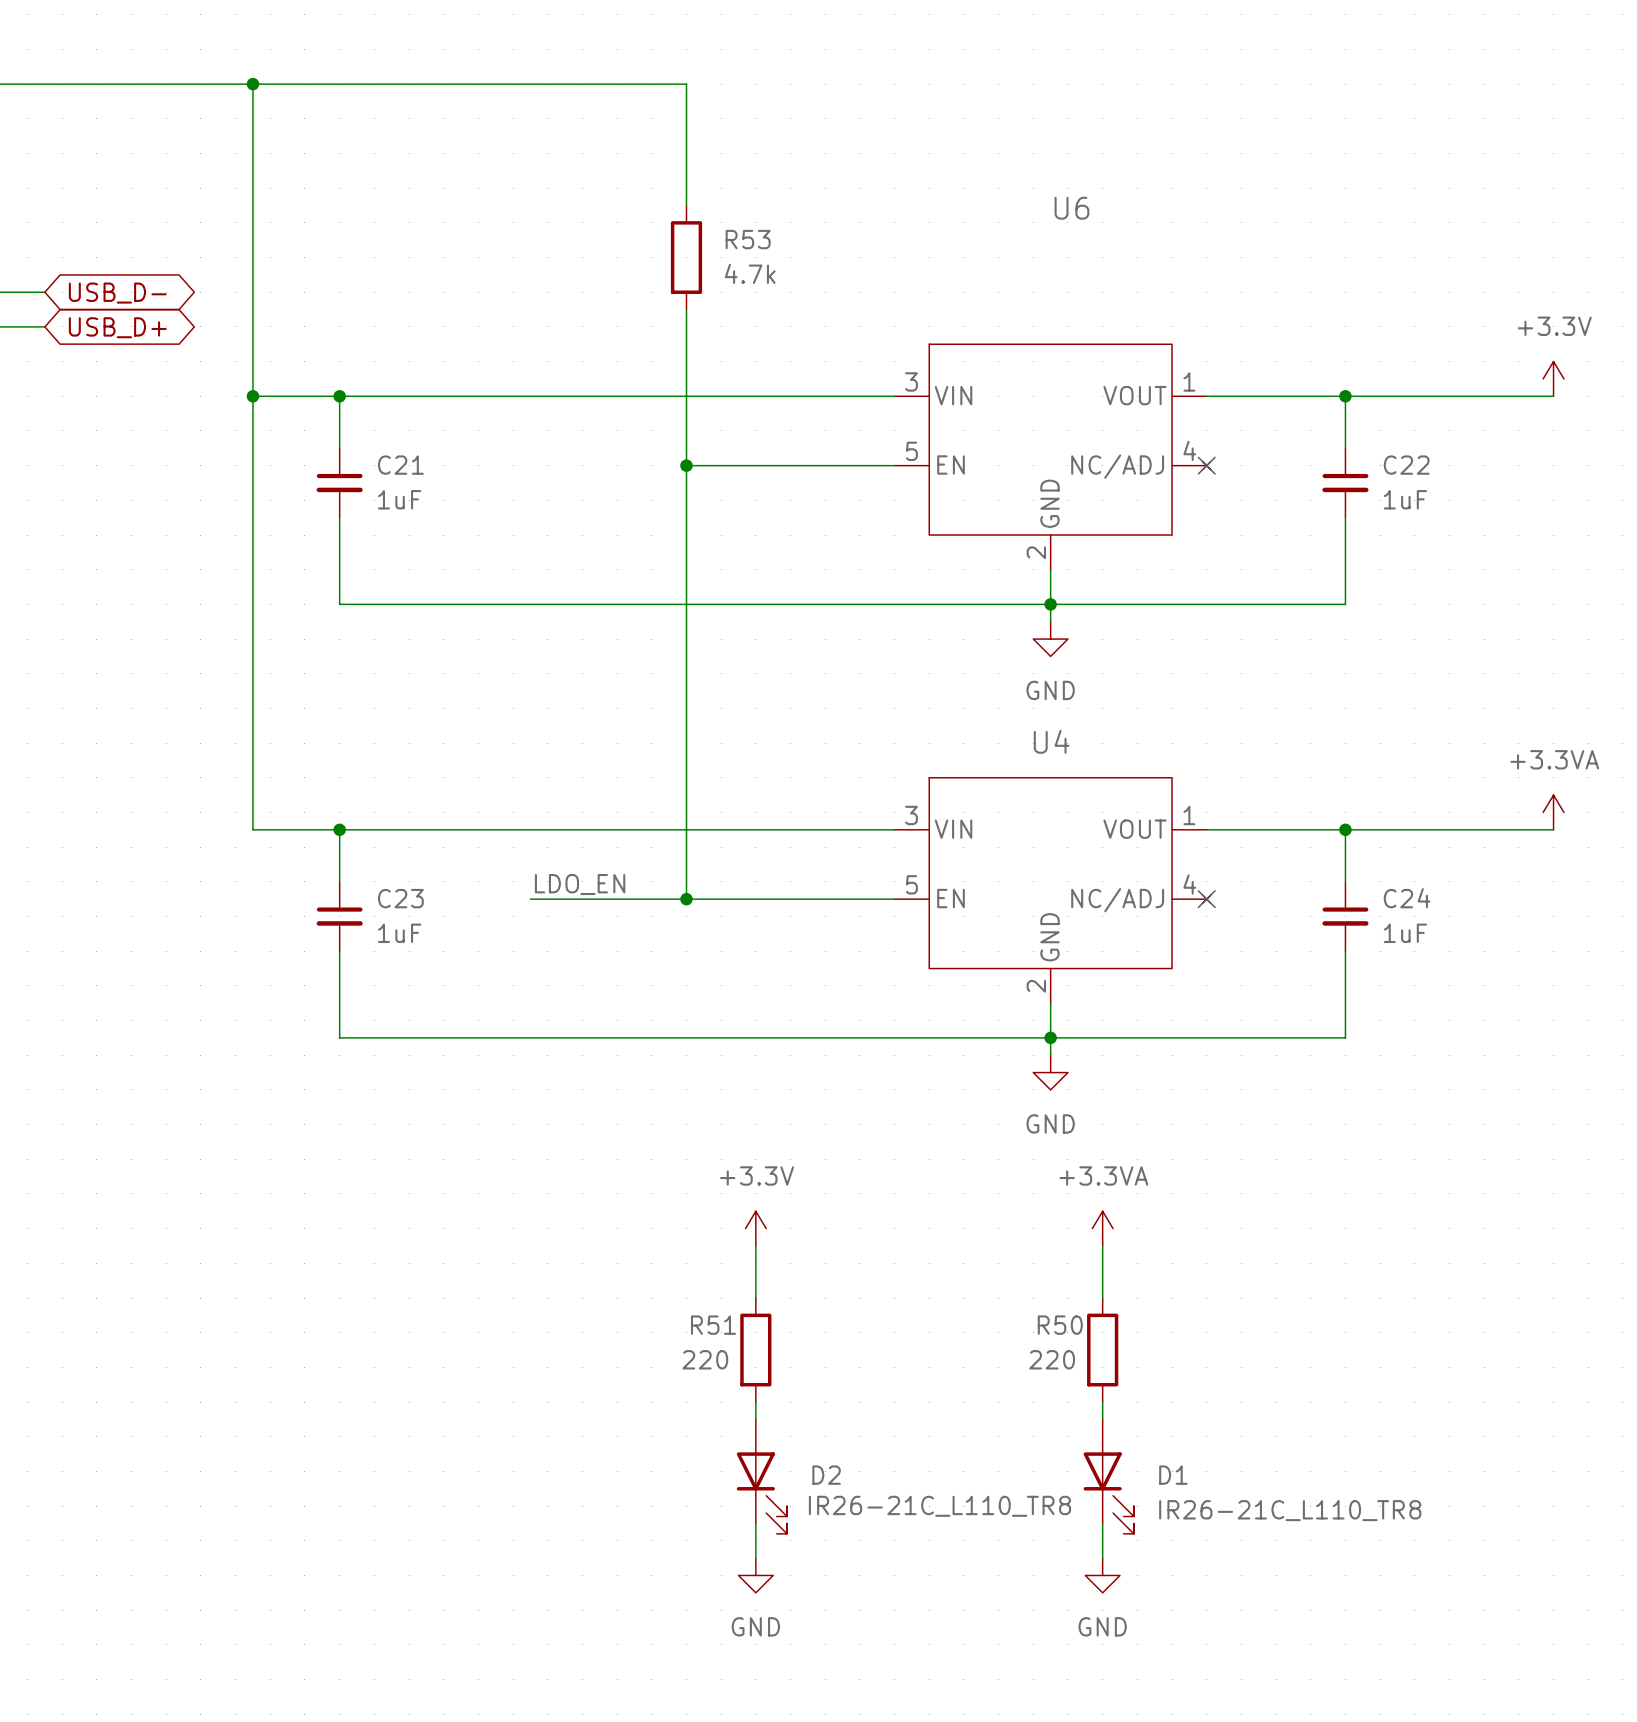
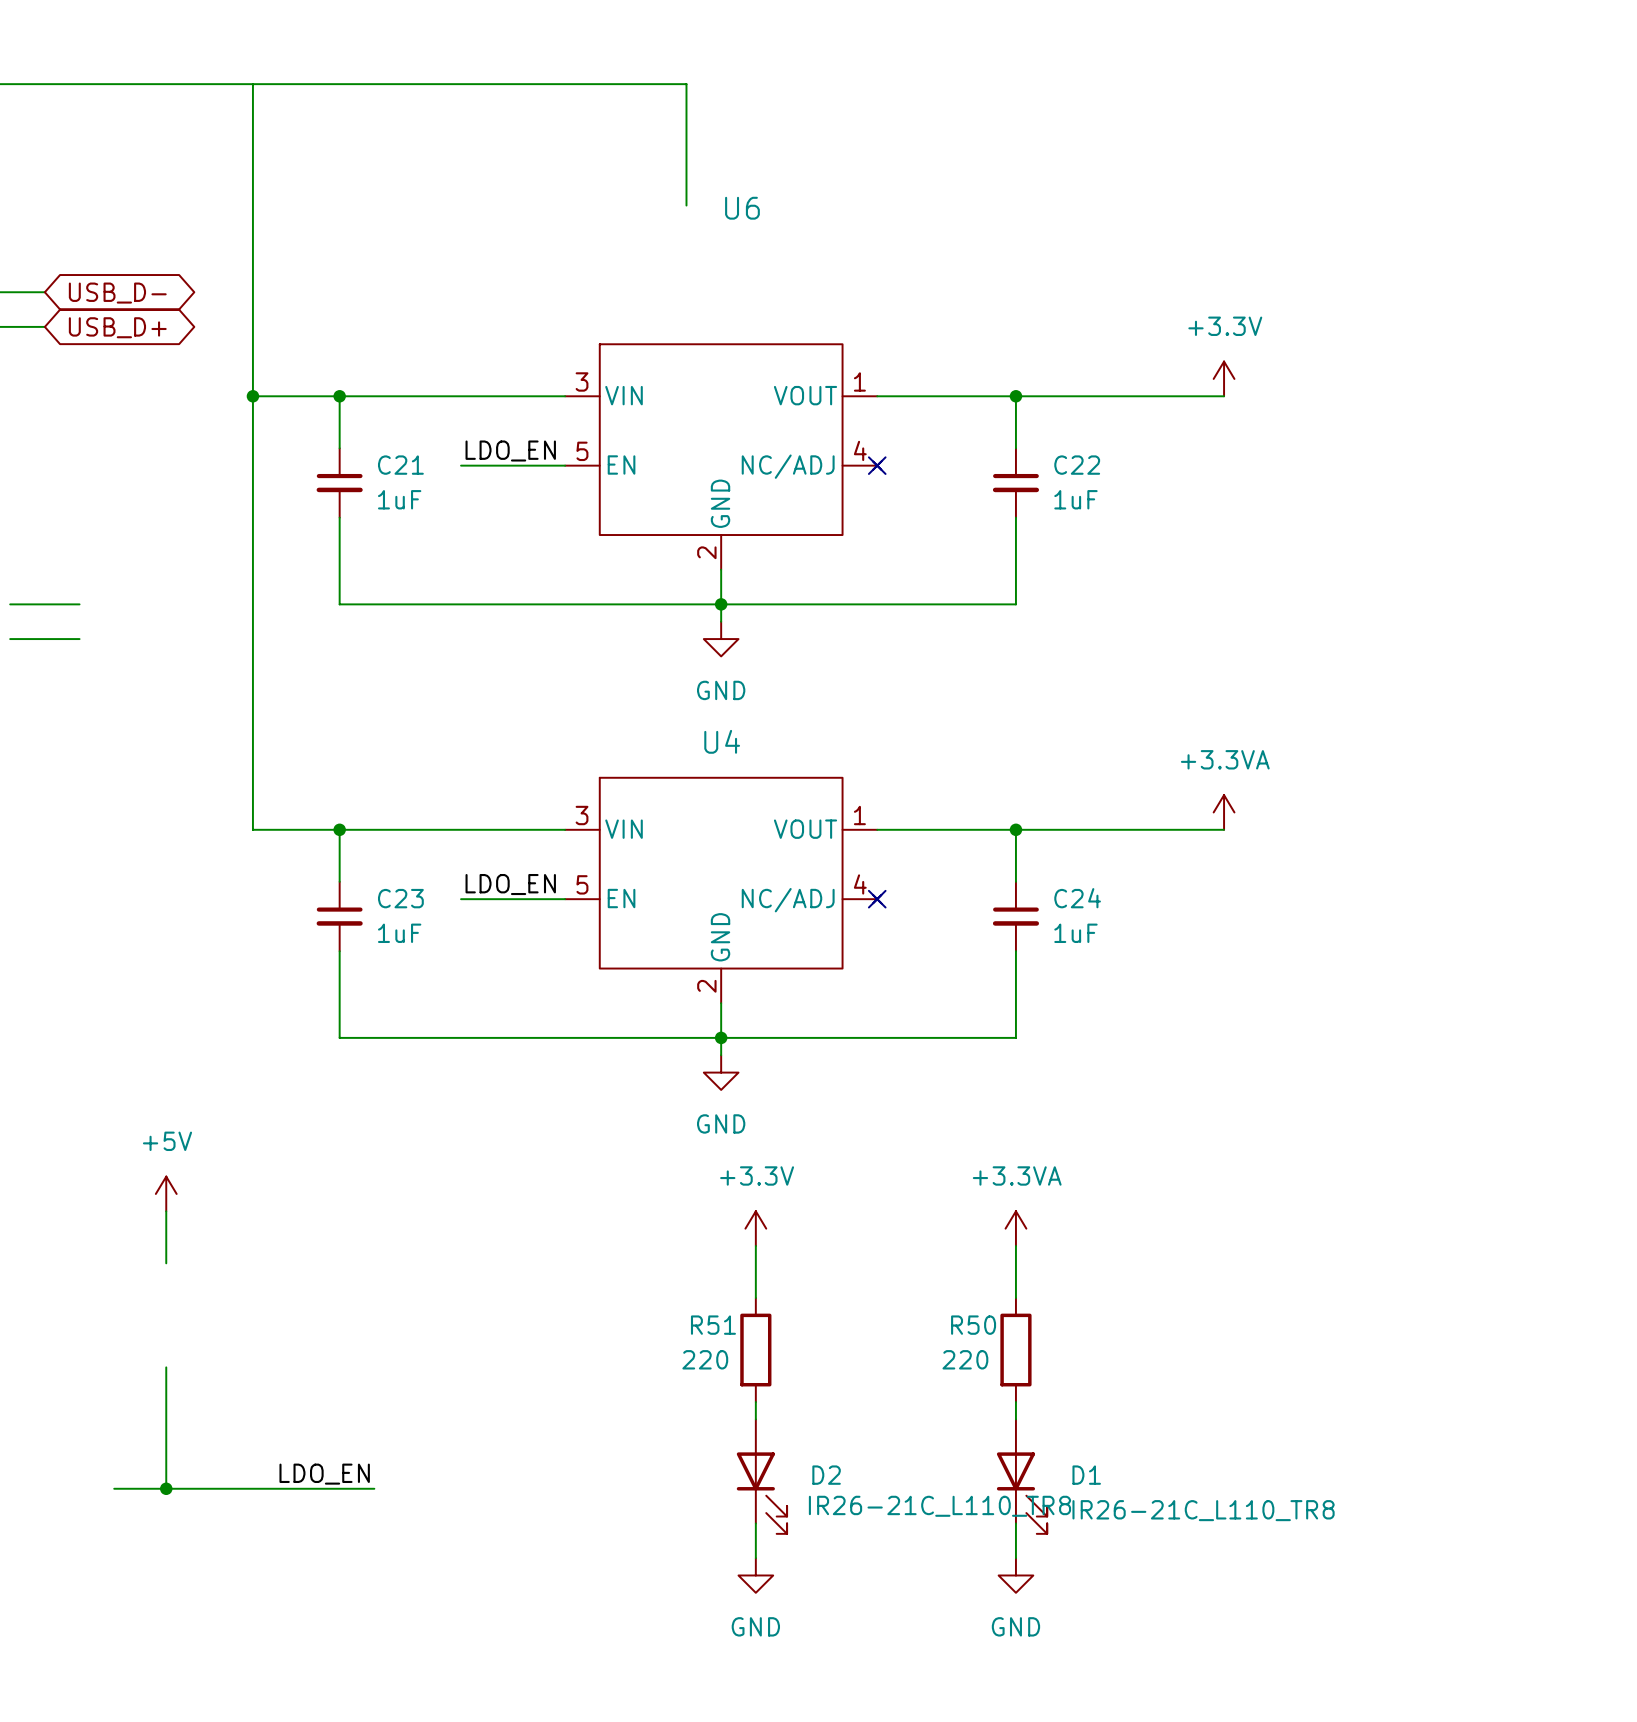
junction: (252, 84) -> none
R53: 4.7k (686, 257) -> none
wire: (686, 309) (686, 899) -> none
power symbol position: +3.3V (1553, 378) -> +3.3V (1224, 378)
wire: (565, 396) (877, 396) -> (894, 396) (1206, 396)
junction: none -> (1015, 396)
wire: (1224, 396) (1553, 396) -> none
wire: (1345, 396) (1345, 448) -> (1015, 396) (1015, 448)
junction: (1345, 396) -> none
label: none -> LDO_EN (510, 451)
U6 position: (1052, 456) -> (723, 456)
wire: none -> (461, 465) (565, 465)
wire: (686, 465) (894, 465) -> none
junction: (686, 465) -> none
no-connect mark: none -> (877, 465)
no-connect mark: (1206, 465) -> none
C22 position: (1345, 482) -> (1015, 482)
wire: (1345, 517) (1345, 604) (1015, 604) -> (1015, 517) (1015, 604)
wire: (1050, 569) (1050, 621) -> (721, 569) (721, 621)
wire: none -> (10, 604) (79, 604)
junction: none -> (721, 604)
junction: (1050, 604) -> none
wire: none -> (10, 639) (79, 639)
power symbol: none -> GND (721, 639)
power symbol: GND (1050, 639) -> none
power symbol: none -> +3.3VA (1224, 812)
power symbol: +3.3VA (1553, 812) -> none
wire: (565, 829) (877, 829) -> (894, 829) (1206, 829)
junction: none -> (1015, 829)
wire: (1224, 829) (1553, 829) -> none
wire: (1345, 829) (1345, 881) -> (1015, 829) (1015, 881)
junction: (1345, 829) -> none
label position: LDO_EN (580, 884) -> LDO_EN (510, 884)
U4 position: (1052, 890) -> (723, 890)
wire: none -> (461, 899) (530, 899)
wire: (565, 899) (894, 899) -> none
junction: (686, 899) -> none
no-connect mark: none -> (877, 899)
no-connect mark: (1206, 899) -> none
C24 position: (1345, 916) -> (1015, 916)
wire: (1345, 951) (1345, 1037) (1015, 1037) -> (1015, 951) (1015, 1037)
wire: (1050, 1003) (1050, 1055) -> (721, 1003) (721, 1055)
junction: none -> (721, 1037)
junction: (1050, 1037) -> none
power symbol: none -> GND (721, 1072)
power symbol: GND (1050, 1072) -> none
power symbol: none -> +5V (166, 1193)
wire: none -> (166, 1211) (166, 1263)
power symbol position: +3.3VA (1102, 1228) -> +3.3VA (1015, 1228)
wire: (1102, 1245) (1102, 1298) -> (1015, 1245) (1015, 1298)
R50 position: (1102, 1350) -> (1015, 1350)
wire: none -> (166, 1367) (166, 1488)
wire: (1102, 1402) (1102, 1419) -> (1015, 1402) (1015, 1419)
label: none -> LDO_EN (324, 1474)
D1 position: (1108, 1476) -> (1022, 1476)
wire: none -> (114, 1488) (374, 1488)
junction: none -> (166, 1488)
wire: (1102, 1523) (1102, 1558) -> (1015, 1523) (1015, 1558)
power symbol position: GND (1102, 1575) -> GND (1015, 1575)

